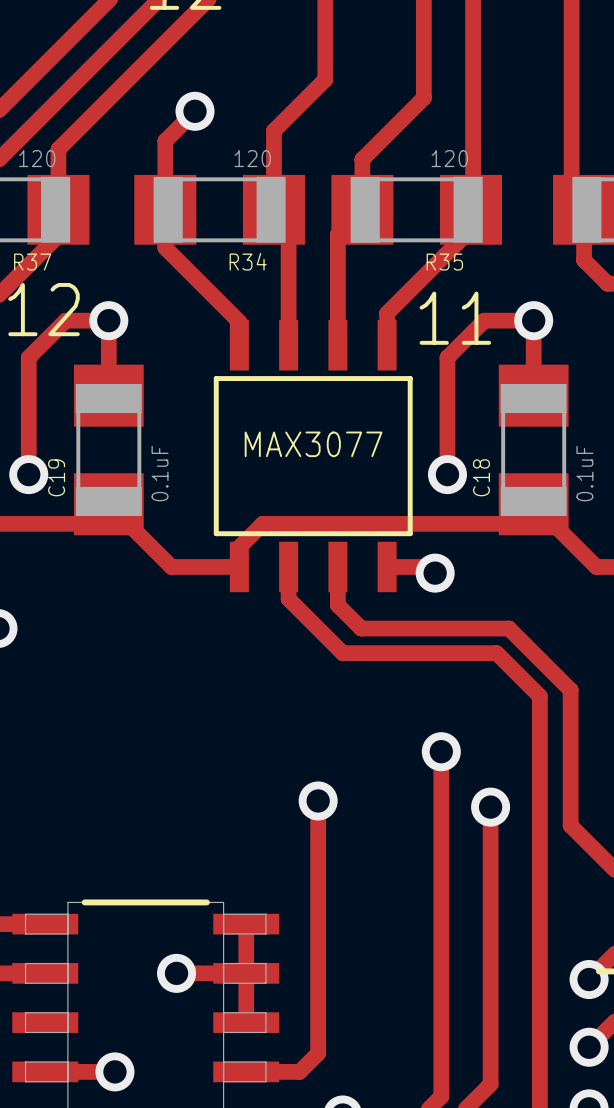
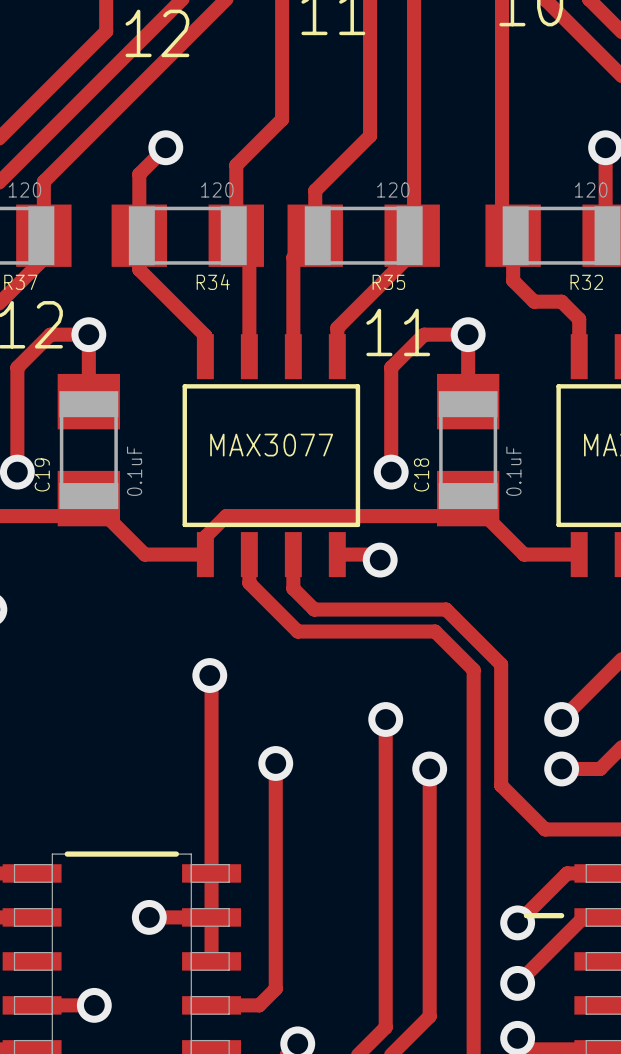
track: none -> (209, 675) (211, 677) (211, 873)
via: none -> (209, 675)

